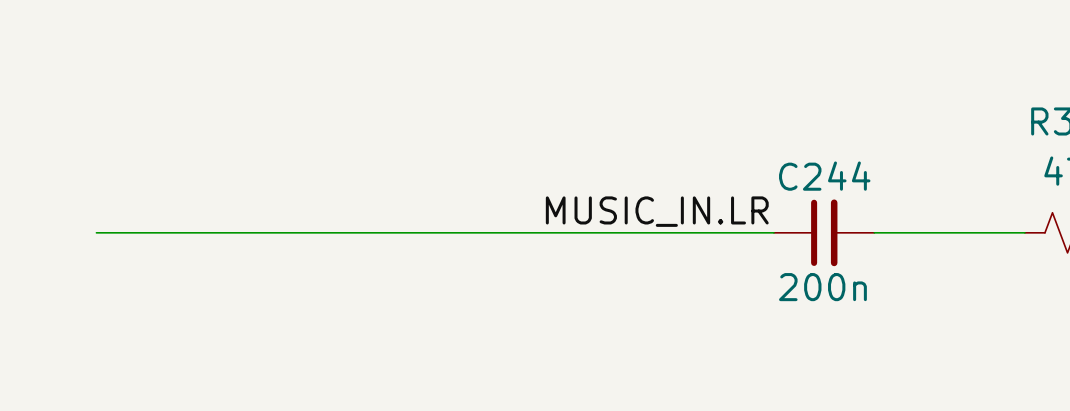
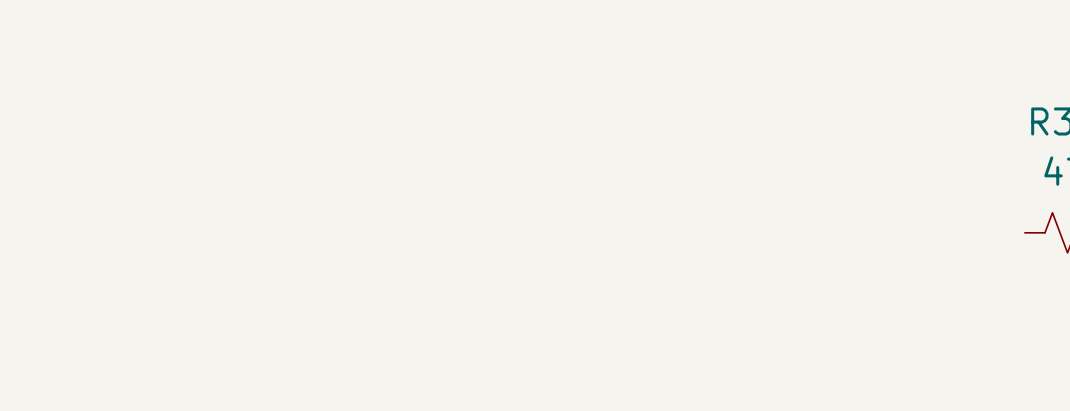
label: MUSIC_IN.LR (657, 211) -> none
wire: (96, 232) (773, 232) -> none
C244: 200n (824, 232) -> none
wire: (874, 232) (1024, 232) -> none

